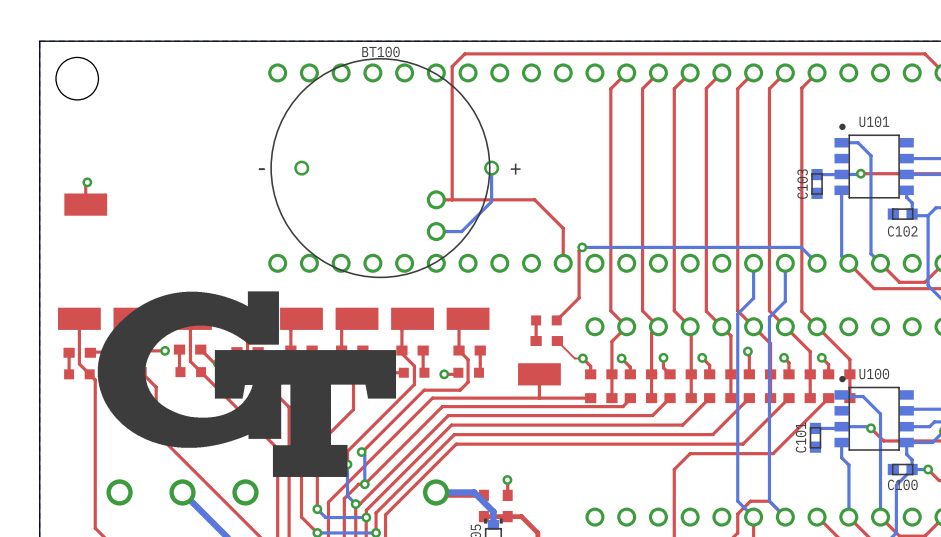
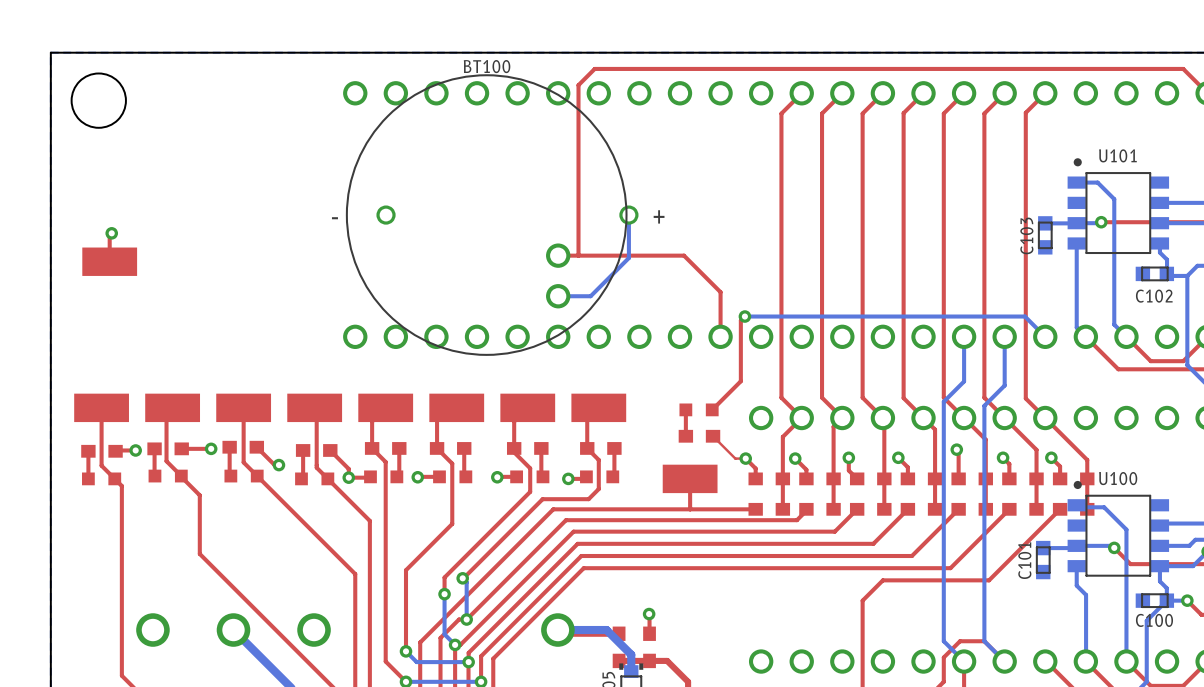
drawing: [97, 291, 397, 477] -> none

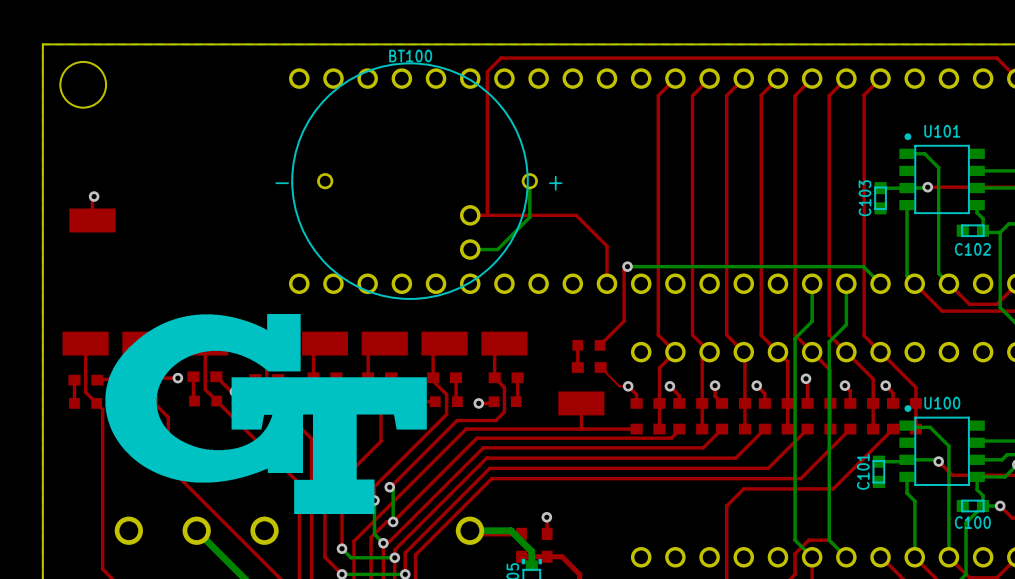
drawing: none -> [105, 314, 427, 515]

